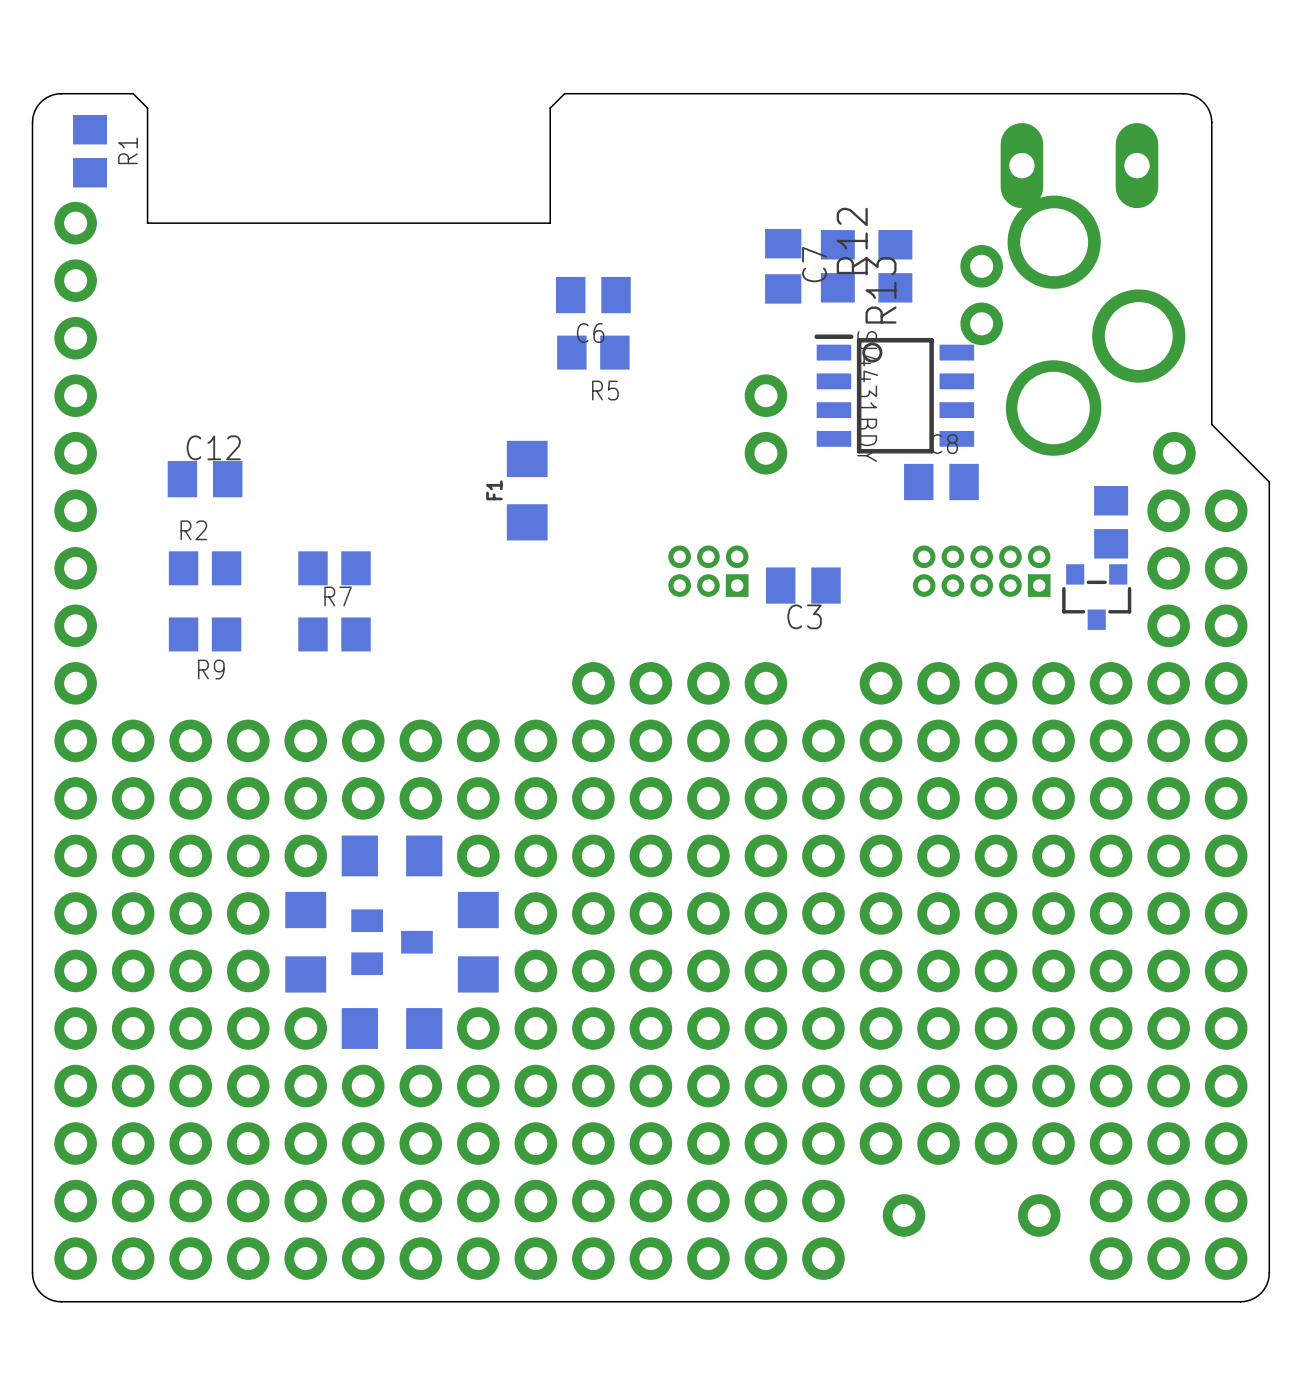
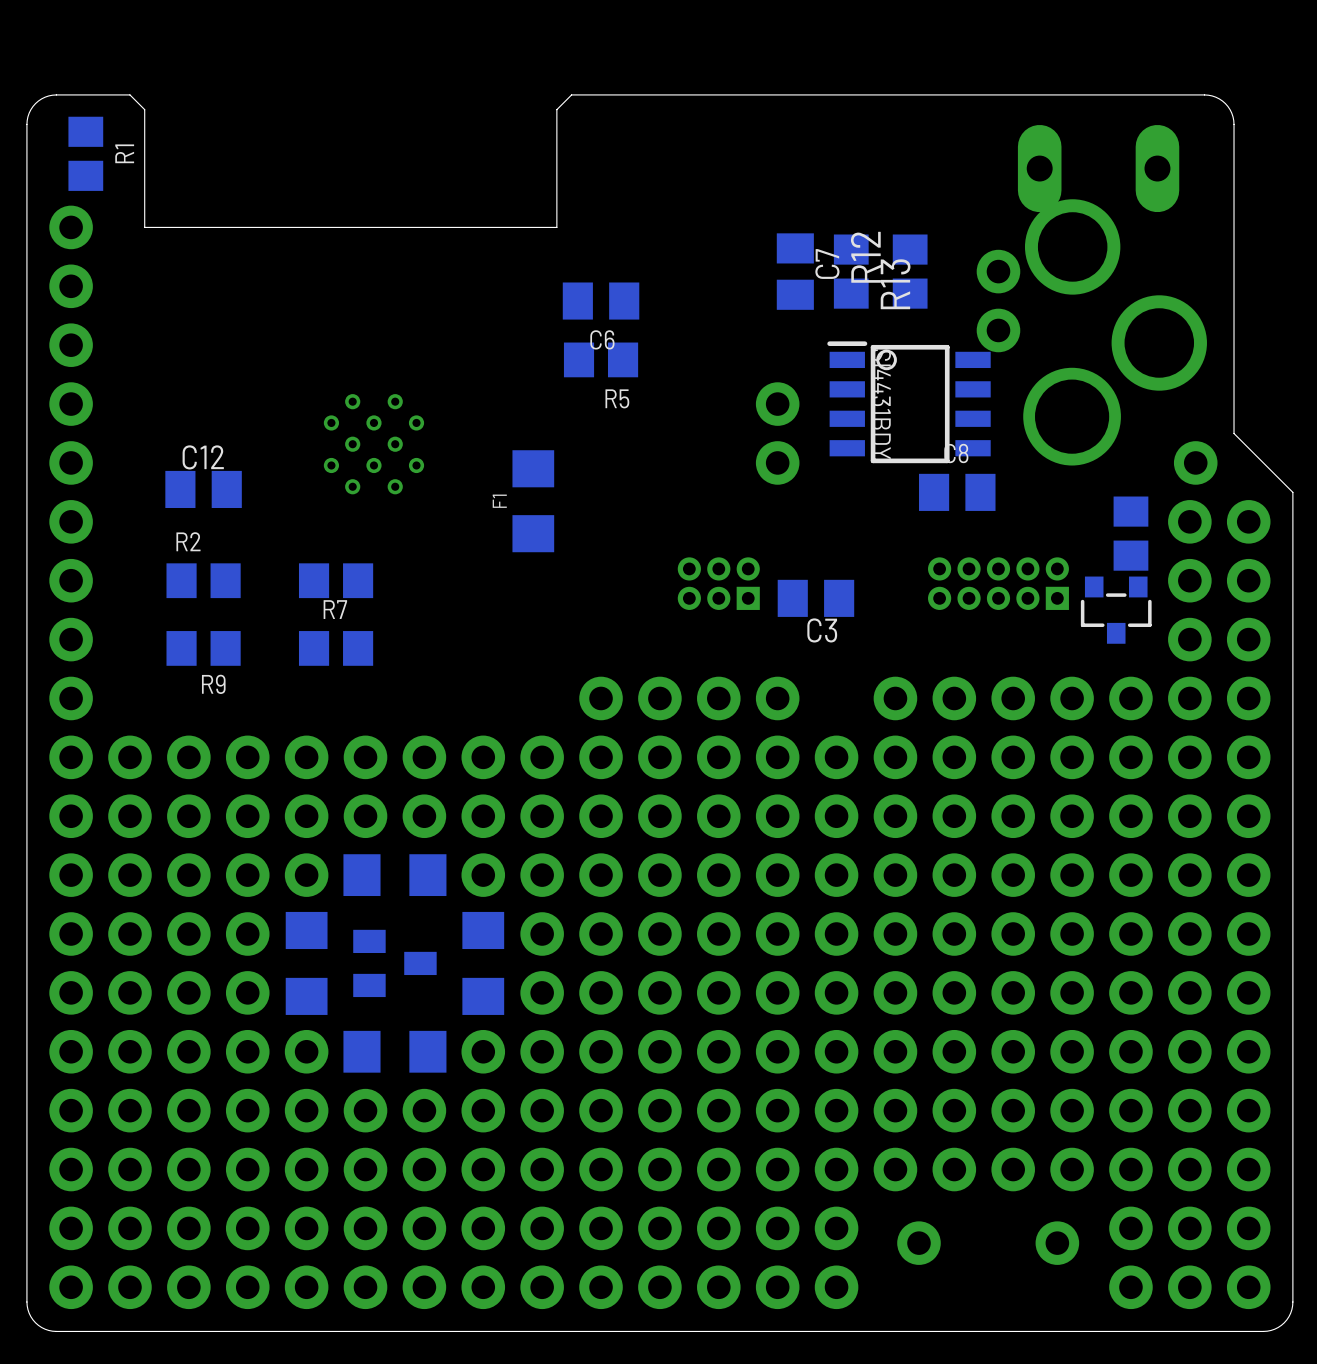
part: none -> (373, 444)

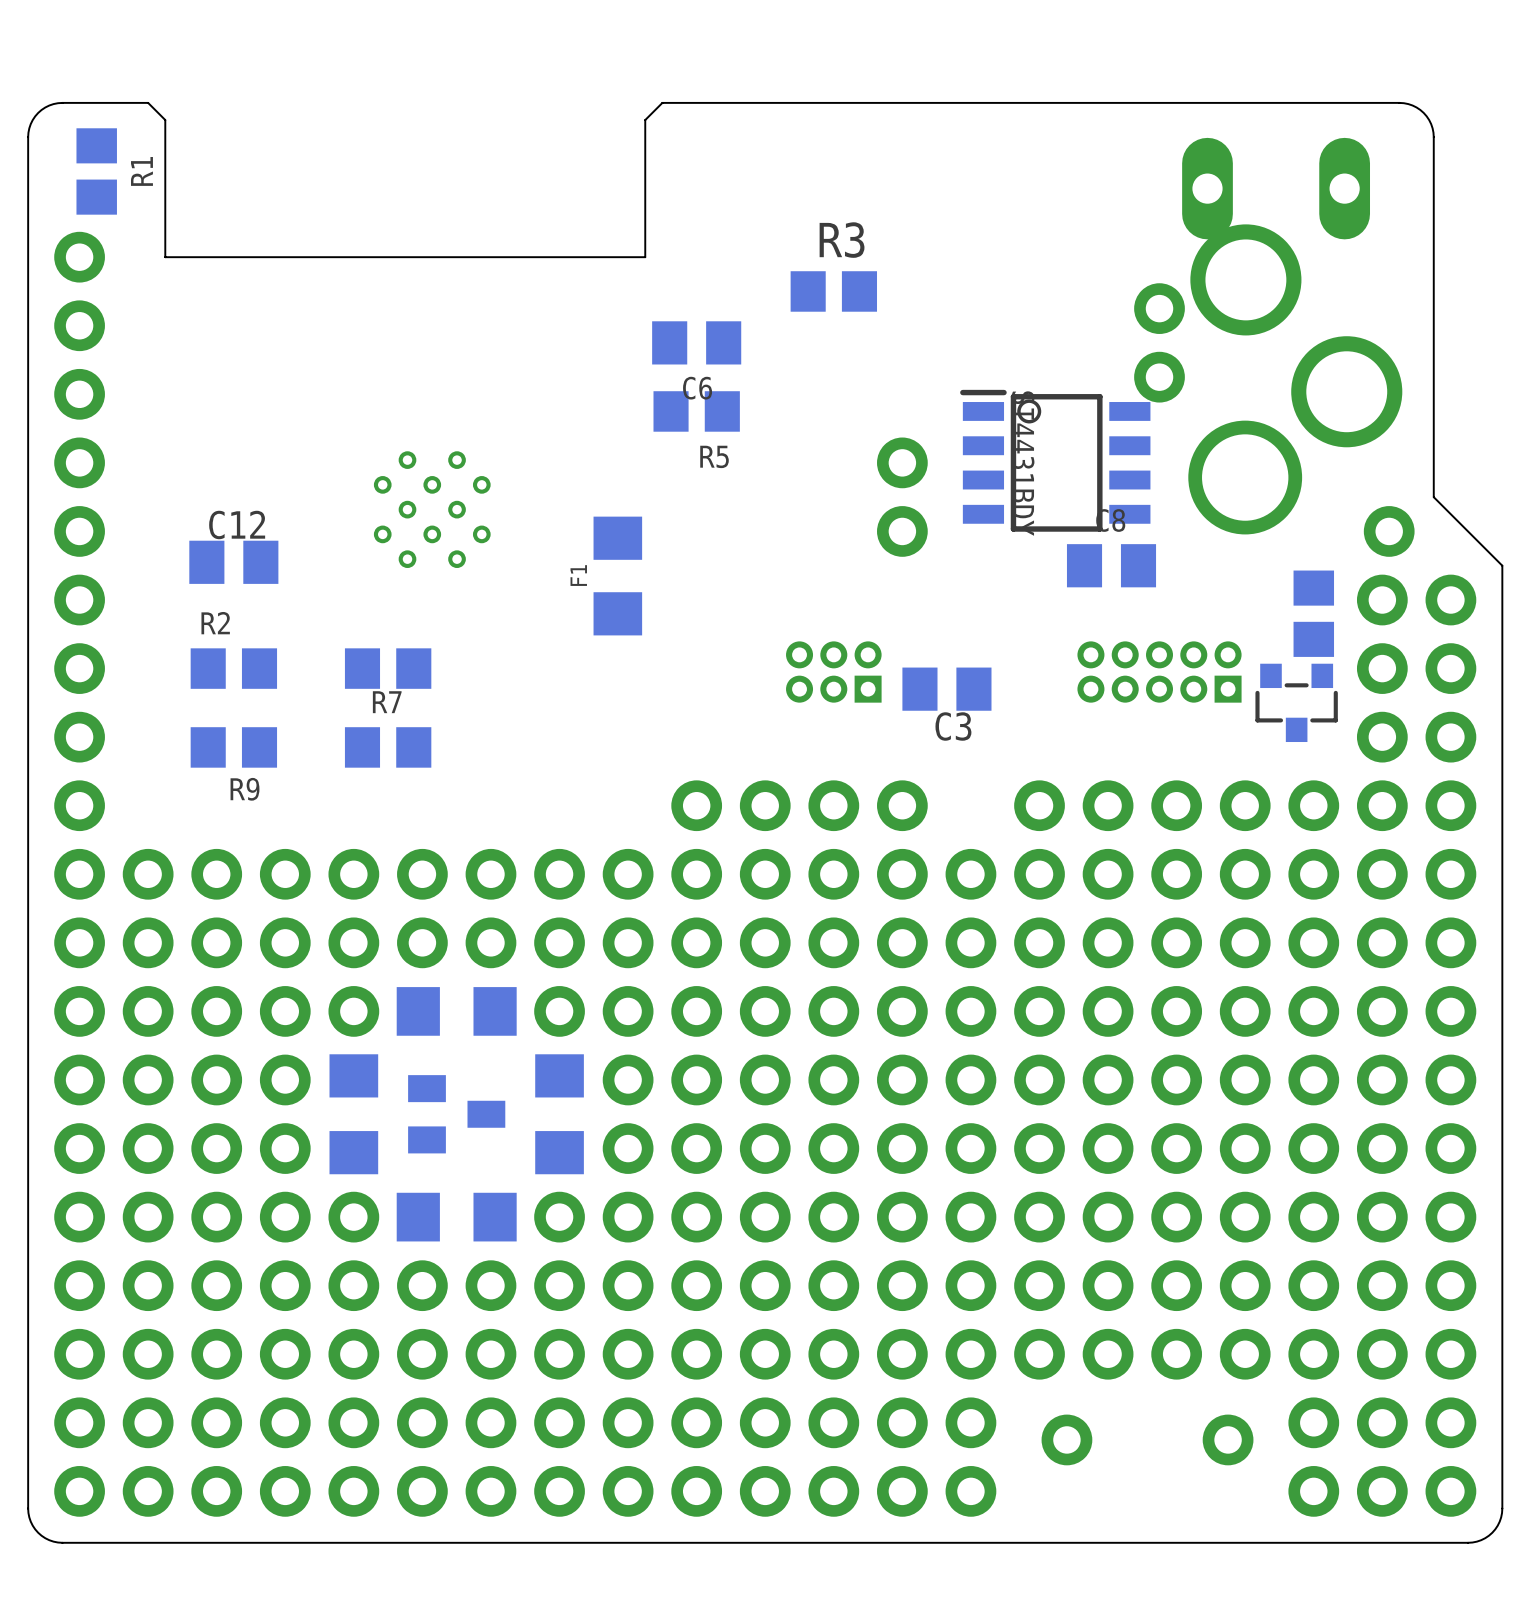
R3: none -> (833, 291)
C7: (795, 271) -> none
R13: (851, 271) -> none
R12: (910, 271) -> none

